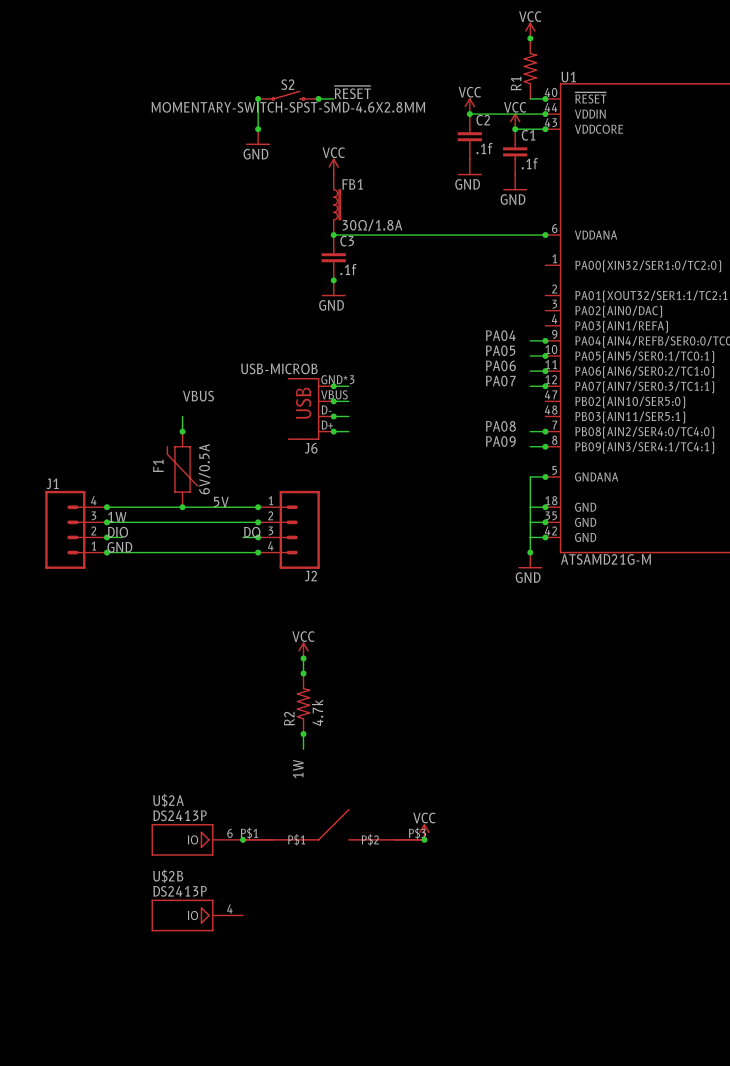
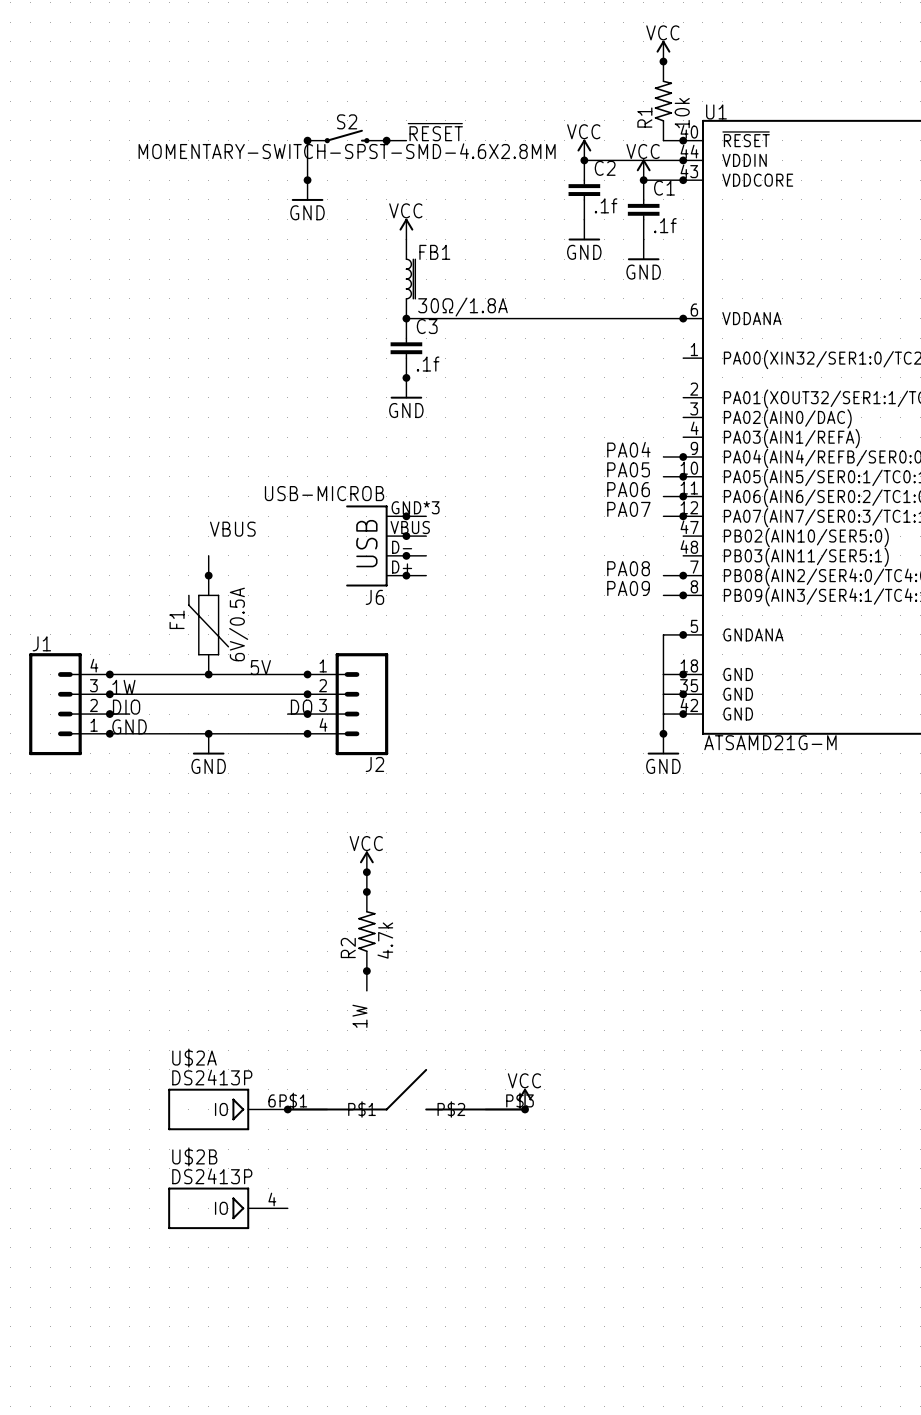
R1 value: none -> 10k (682, 113)
junction: none -> (208, 733)
power symbol: none -> GND (208, 744)

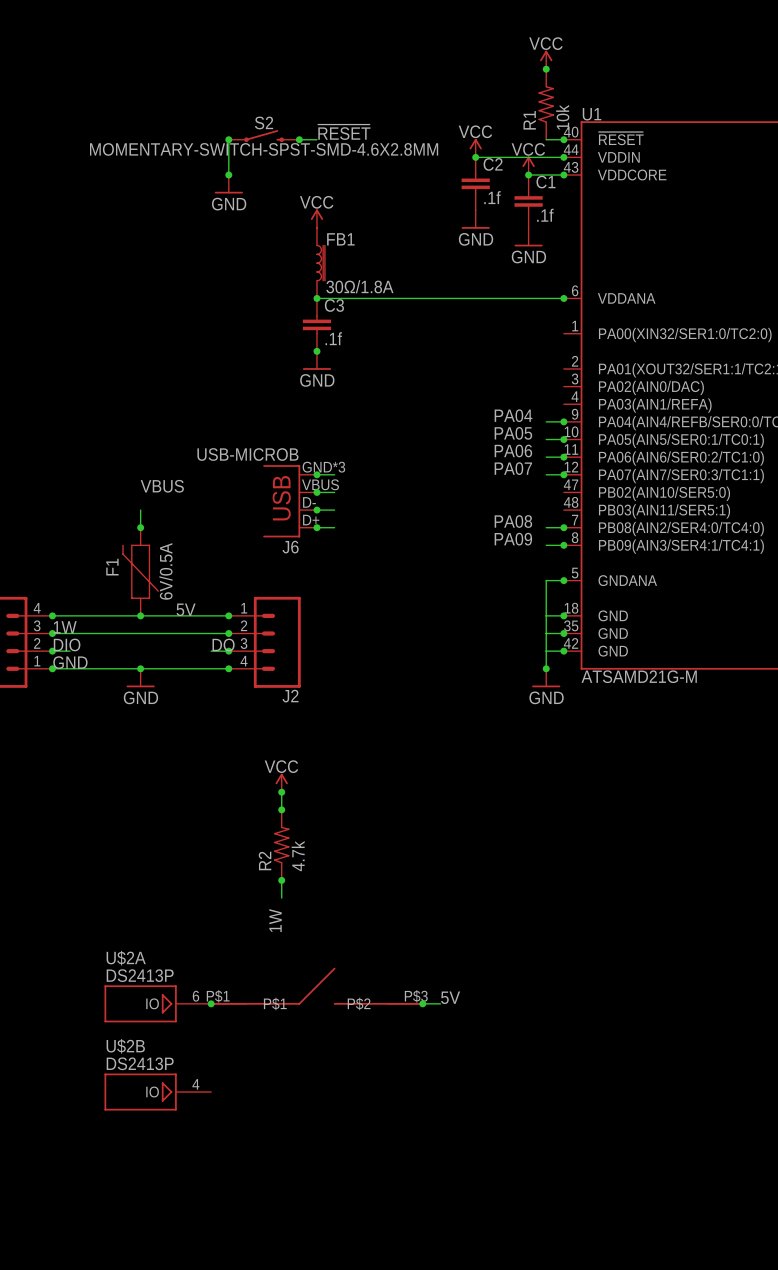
power symbol: VCC (525, 1099) -> none
label: none -> 5V (450, 997)
wire: none -> (422, 1003) (440, 1003)

